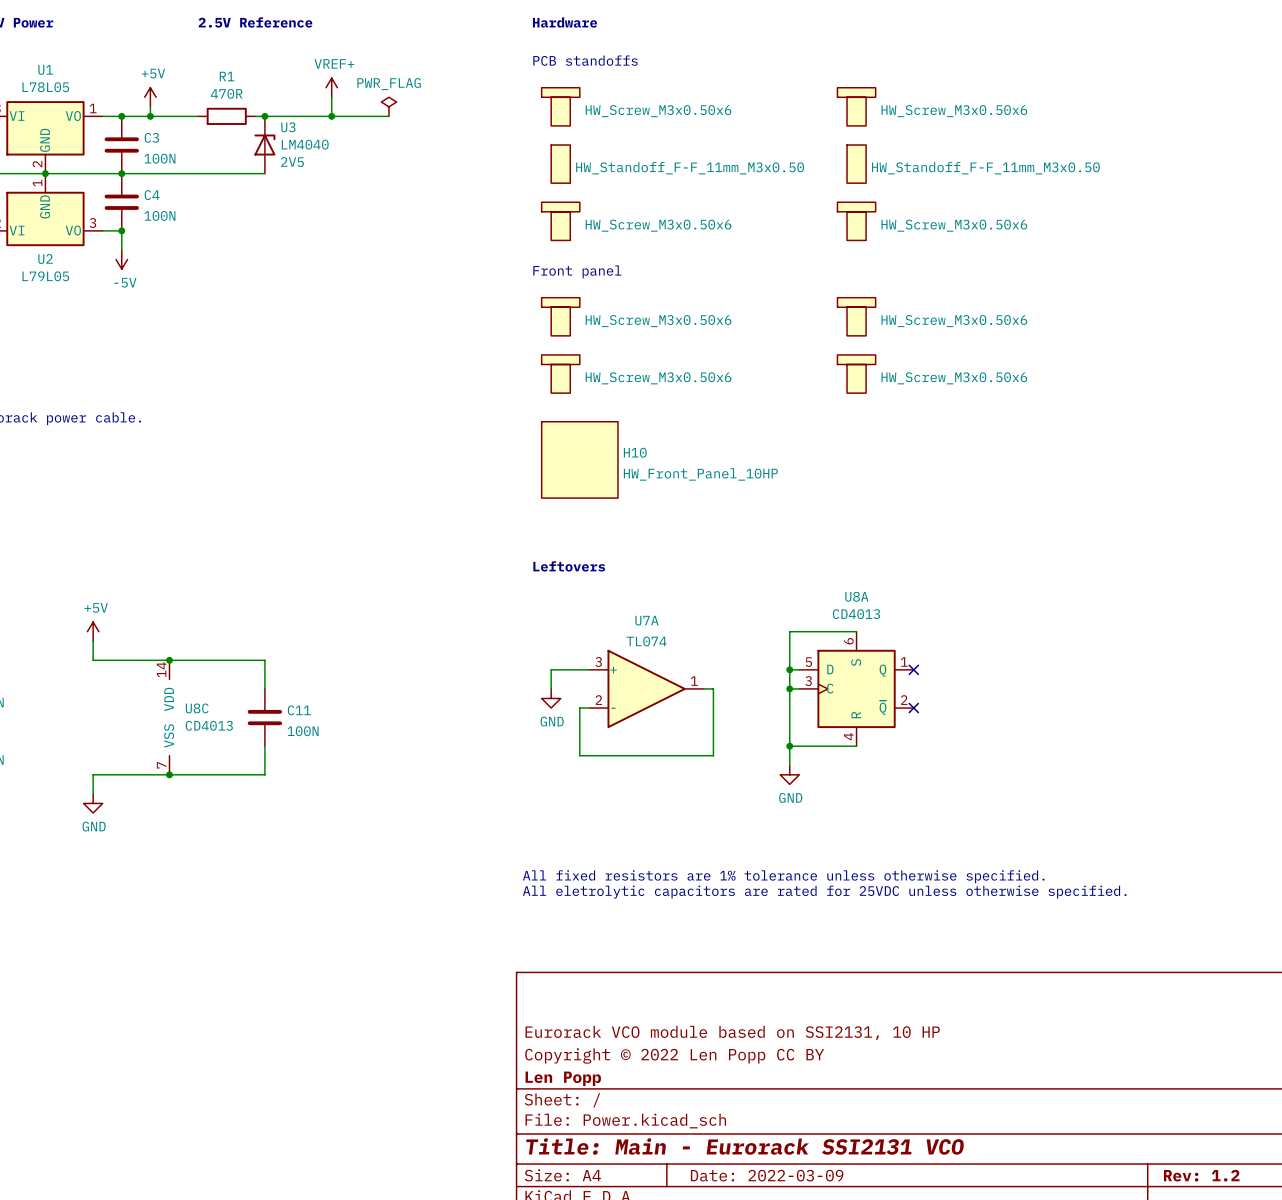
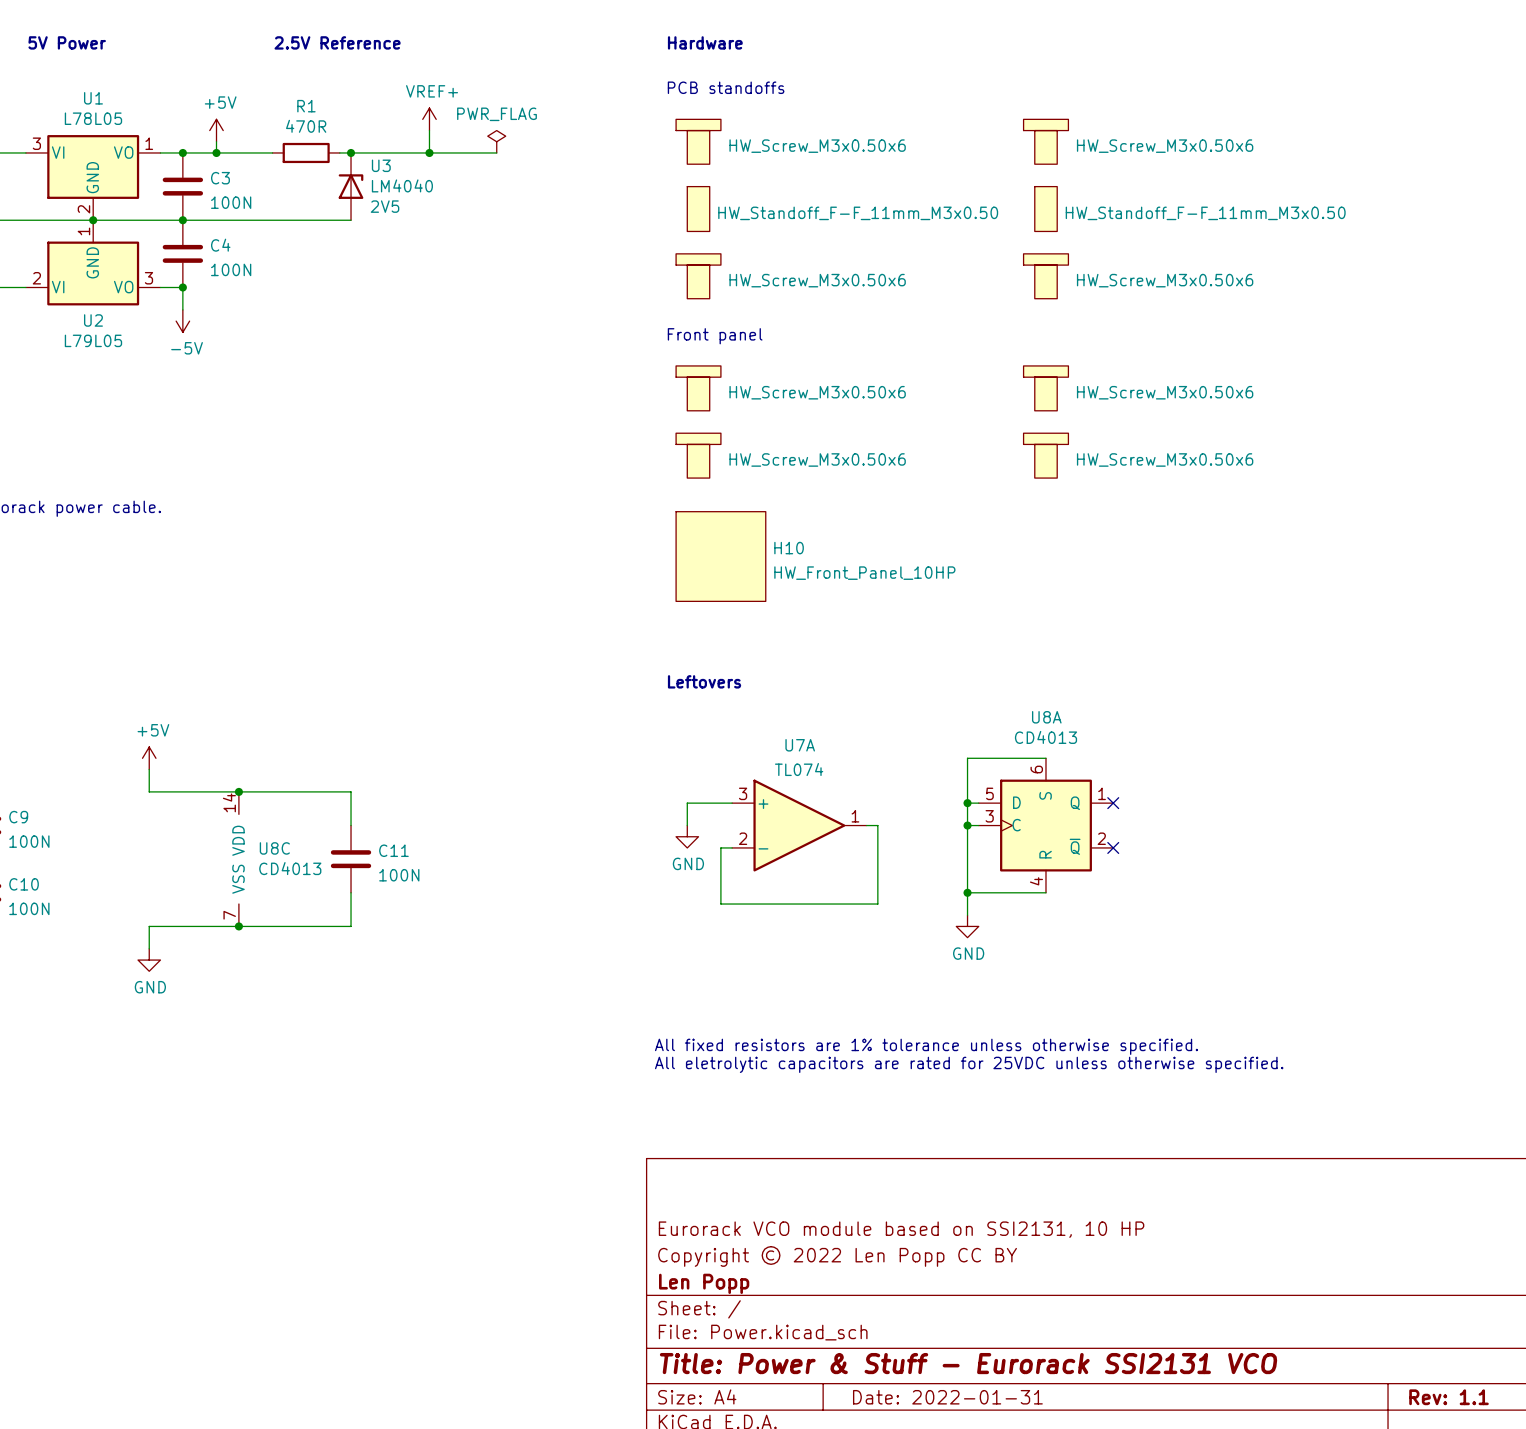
title block: Title: Main - Eurorack SSI2131 VCO (745, 1146) -> Title: Power & Stuff - Eurorack SSI2131 VCO (968, 1363)
title block: Date: 2022-03-09 (767, 1175) -> Date: 2022-01-31 (947, 1397)
title block: Rev: 1.2 (1201, 1175) -> Rev: 1.1 (1449, 1397)

